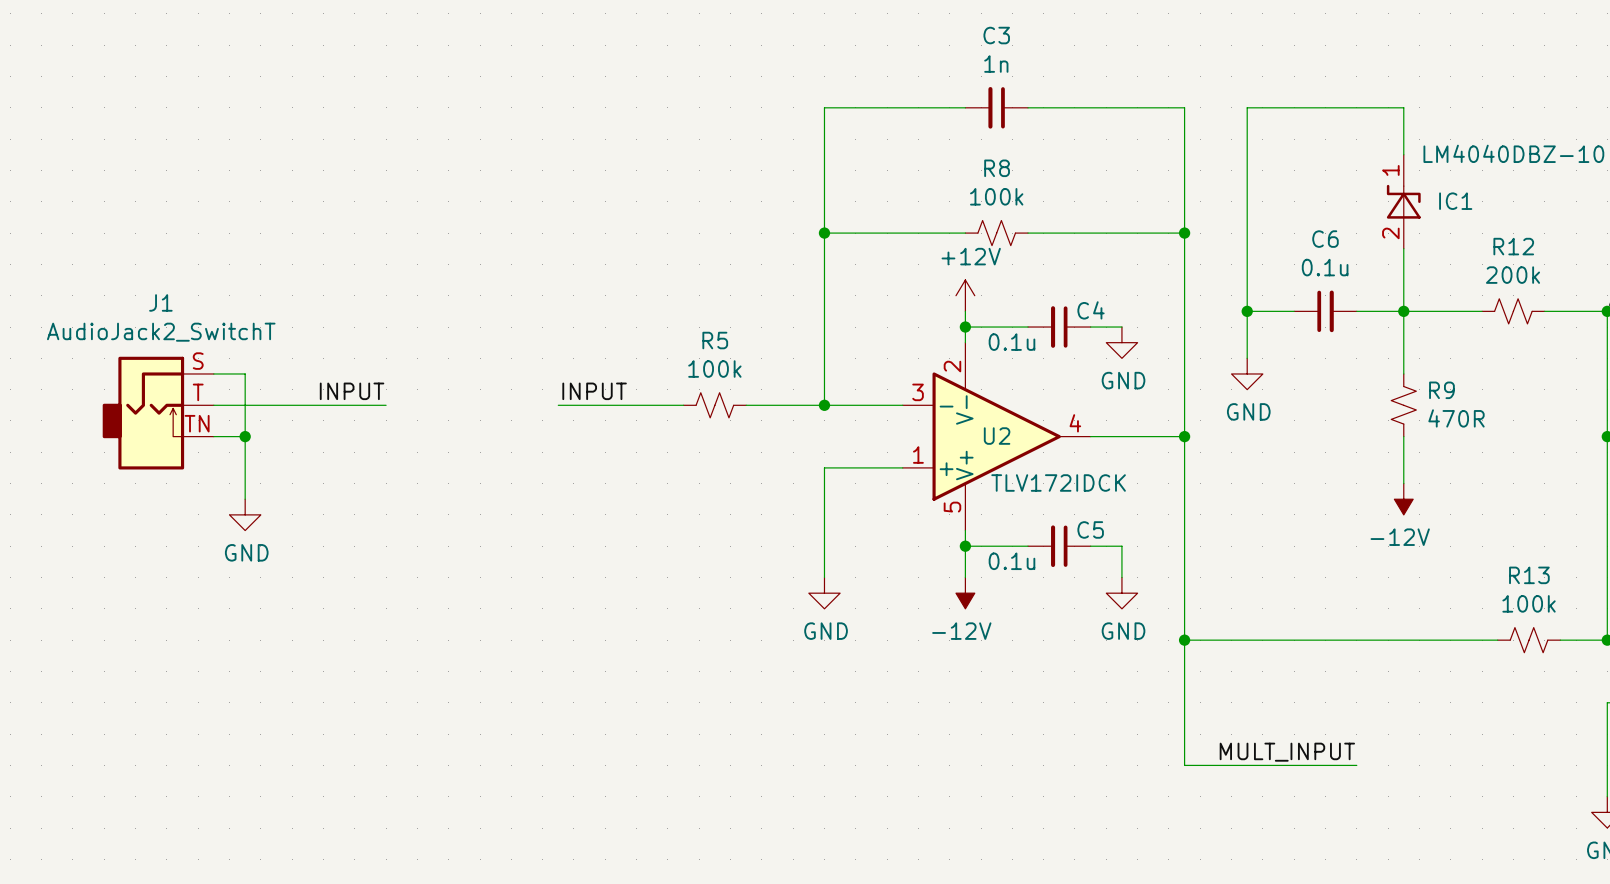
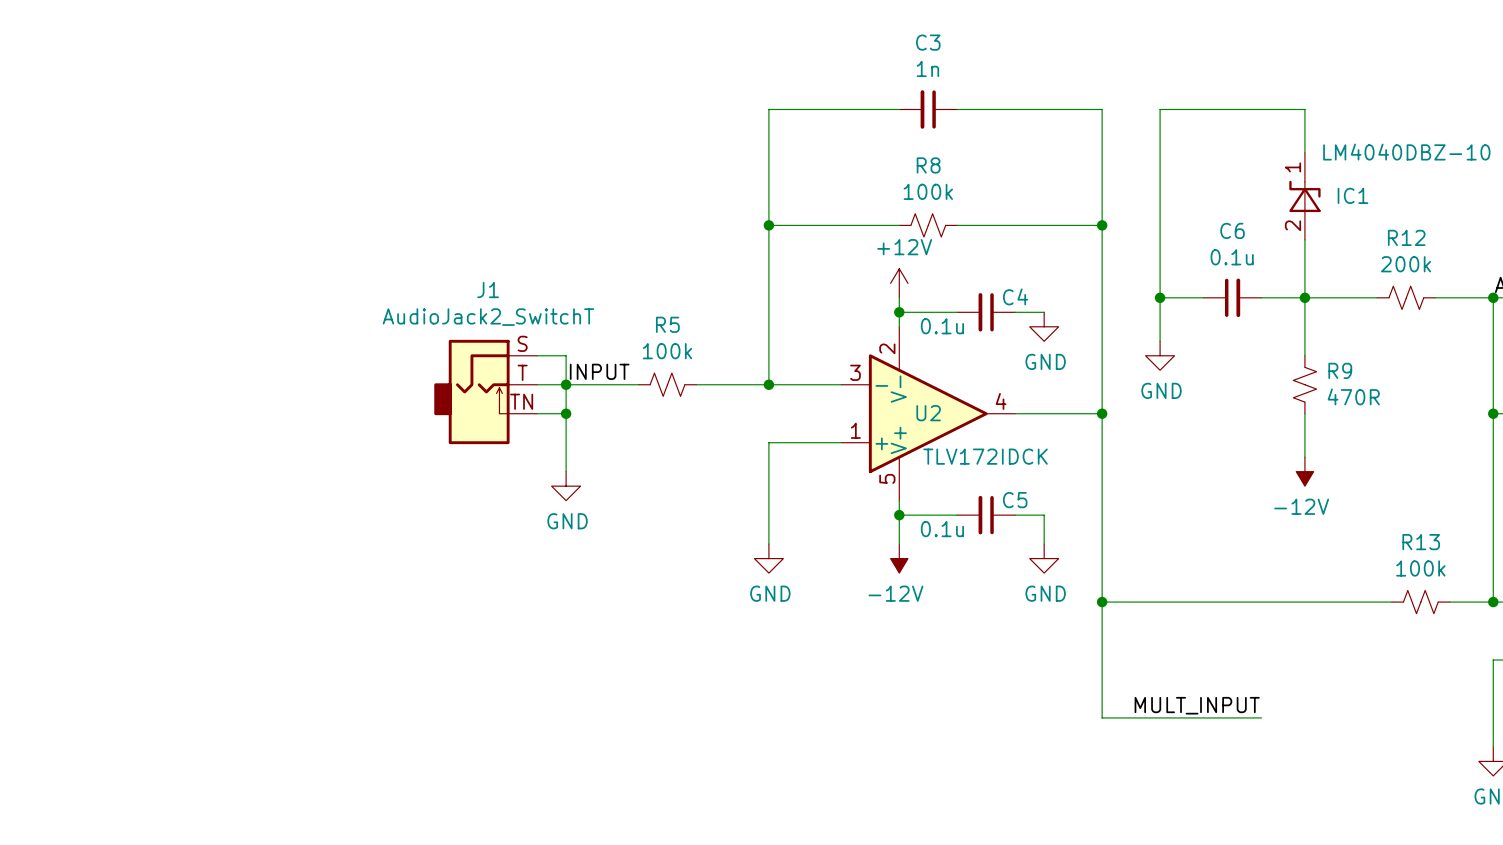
wire: (213, 373) (245, 373) (245, 499) -> none
wire: none -> (537, 355) (566, 355) (566, 471)
label: INPUT (352, 391) -> none
label position: INPUT (594, 391) -> INPUT (599, 371)
wire: (213, 405) (386, 405) -> none
junction: none -> (566, 384)
J1 position: (158, 413) -> (485, 391)
wire: (213, 436) (245, 436) -> none
junction: (245, 436) -> none
wire: none -> (537, 413) (566, 413)
junction: none -> (566, 413)
power symbol: GND (245, 514) -> none
power symbol: none -> GND (566, 486)

